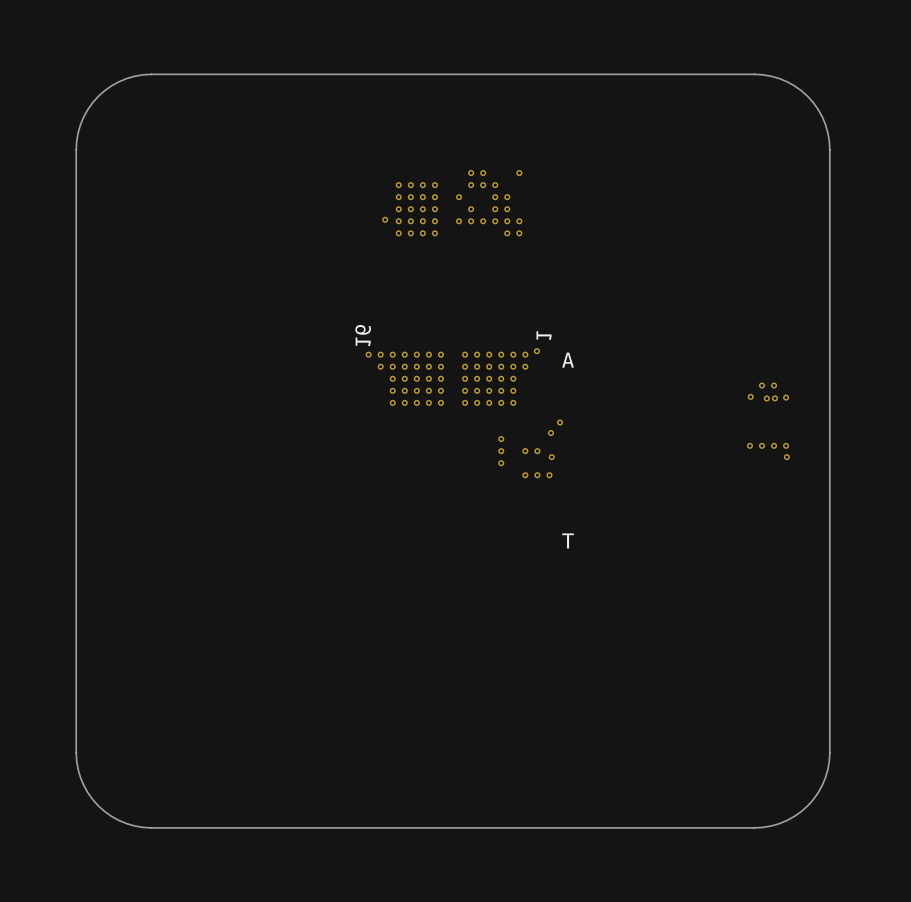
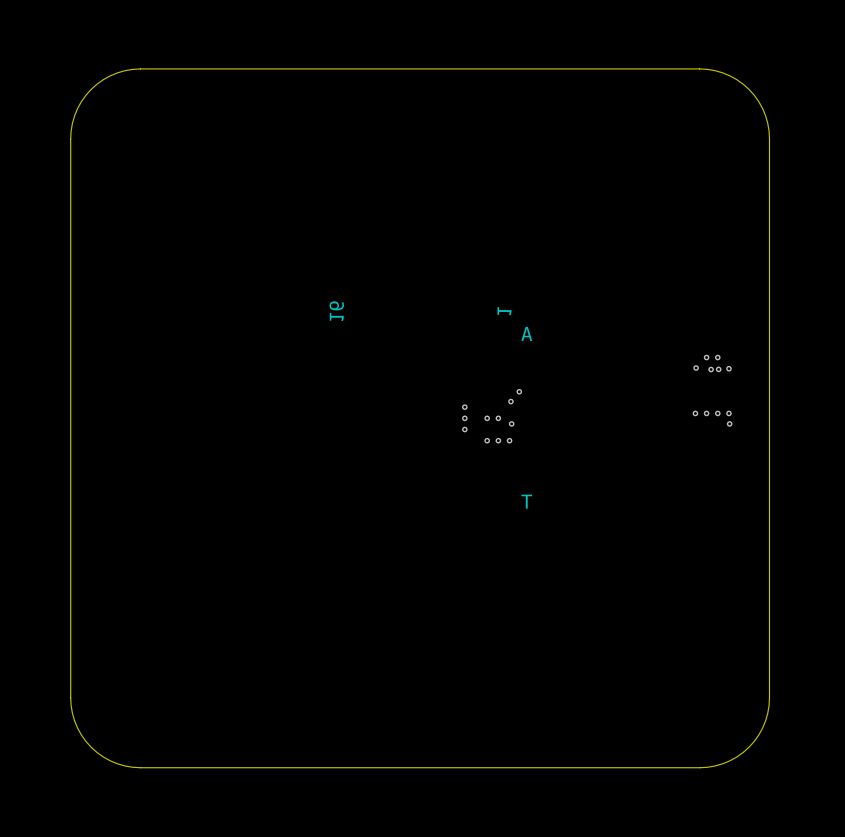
via: (471, 173) -> none
via: (483, 173) -> none
via: (519, 173) -> none
via: (398, 185) -> none
via: (410, 185) -> none
via: (422, 185) -> none
via: (434, 185) -> none
via: (471, 185) -> none
via: (483, 185) -> none
via: (495, 185) -> none
via: (398, 197) -> none
via: (410, 197) -> none
via: (422, 197) -> none
via: (434, 197) -> none
via: (459, 197) -> none
via: (495, 197) -> none
via: (507, 197) -> none
via: (398, 209) -> none
via: (410, 209) -> none
via: (422, 209) -> none
via: (434, 209) -> none
via: (471, 209) -> none
via: (495, 209) -> none
via: (507, 209) -> none
via: (385, 219) -> none
via: (398, 221) -> none
via: (410, 221) -> none
via: (422, 221) -> none
via: (434, 221) -> none
via: (459, 221) -> none
via: (471, 221) -> none
via: (483, 221) -> none
via: (495, 221) -> none
via: (507, 221) -> none
via: (519, 221) -> none
via: (398, 233) -> none
via: (410, 233) -> none
via: (422, 233) -> none
via: (434, 233) -> none
via: (507, 233) -> none
via: (519, 233) -> none
via: (536, 351) -> none
via: (368, 354) -> none
via: (380, 354) -> none
via: (392, 354) -> none
via: (404, 354) -> none
via: (416, 354) -> none
via: (428, 354) -> none
via: (440, 354) -> none
via: (465, 354) -> none
via: (477, 354) -> none
via: (489, 354) -> none
via: (501, 354) -> none
via: (513, 354) -> none
via: (525, 354) -> none
via: (380, 366) -> none
via: (392, 366) -> none
via: (404, 366) -> none
via: (416, 366) -> none
via: (428, 366) -> none
via: (440, 366) -> none
via: (465, 366) -> none
via: (477, 366) -> none
via: (489, 366) -> none
via: (501, 366) -> none
via: (513, 366) -> none
via: (525, 366) -> none
via: (392, 378) -> none
via: (404, 378) -> none
via: (416, 378) -> none
via: (428, 378) -> none
via: (440, 378) -> none
via: (465, 378) -> none
via: (477, 378) -> none
via: (489, 378) -> none
via: (501, 378) -> none
via: (513, 378) -> none
via: (392, 390) -> none
via: (404, 390) -> none
via: (416, 390) -> none
via: (428, 390) -> none
via: (440, 390) -> none
via: (465, 390) -> none
via: (477, 390) -> none
via: (489, 390) -> none
via: (501, 390) -> none
via: (513, 390) -> none
via: (392, 402) -> none
via: (404, 402) -> none
via: (416, 402) -> none
via: (428, 402) -> none
via: (440, 402) -> none
via: (465, 402) -> none
via: (477, 402) -> none
via: (489, 402) -> none
via: (501, 402) -> none
via: (513, 402) -> none

